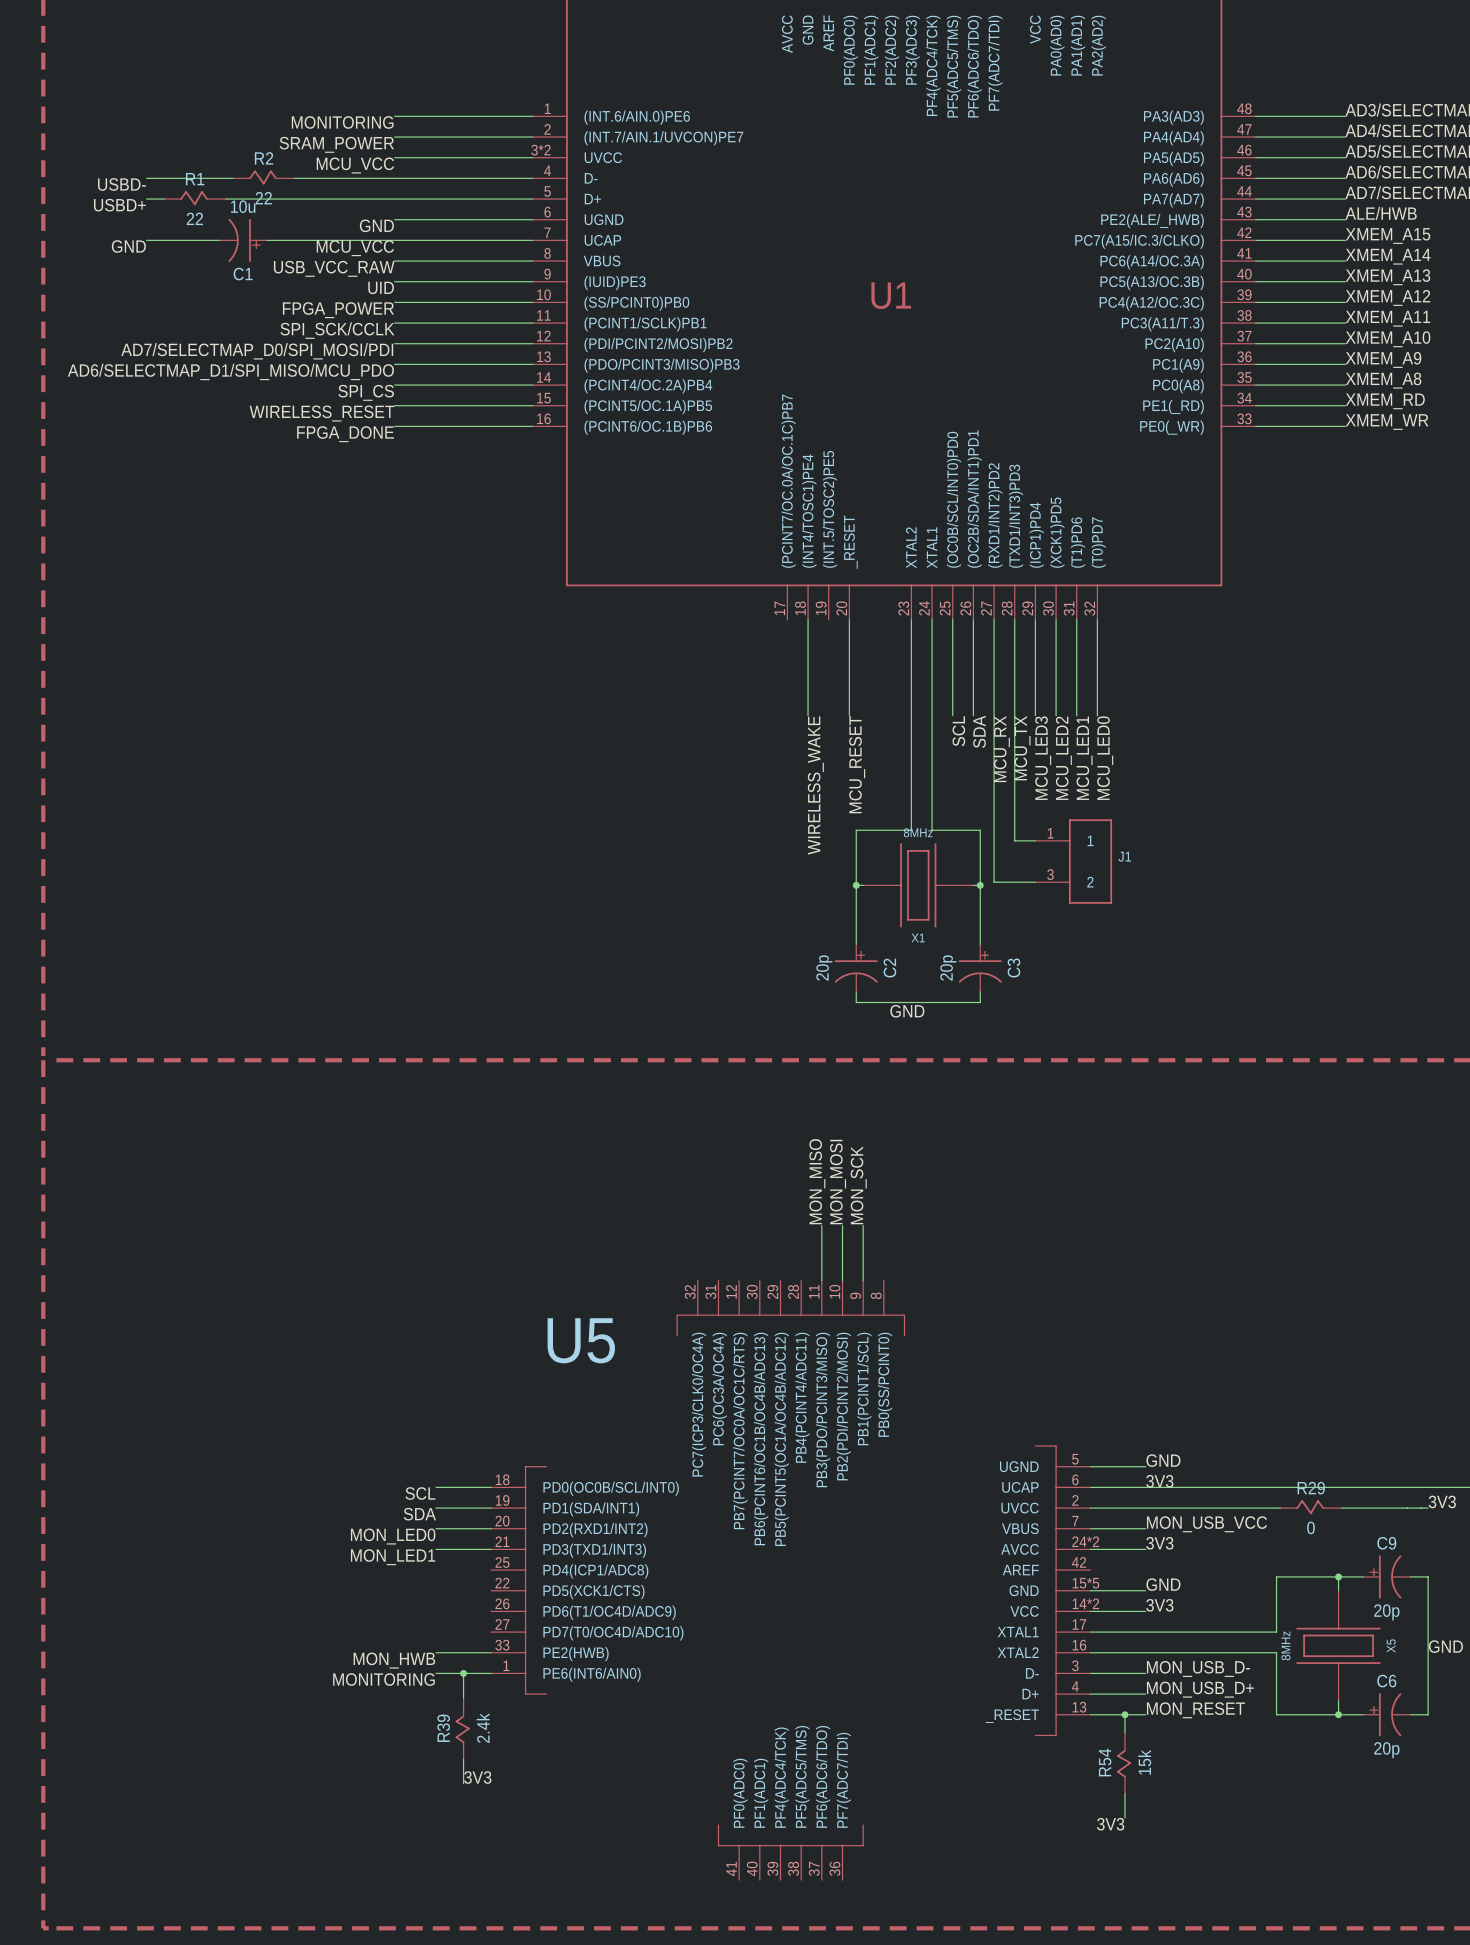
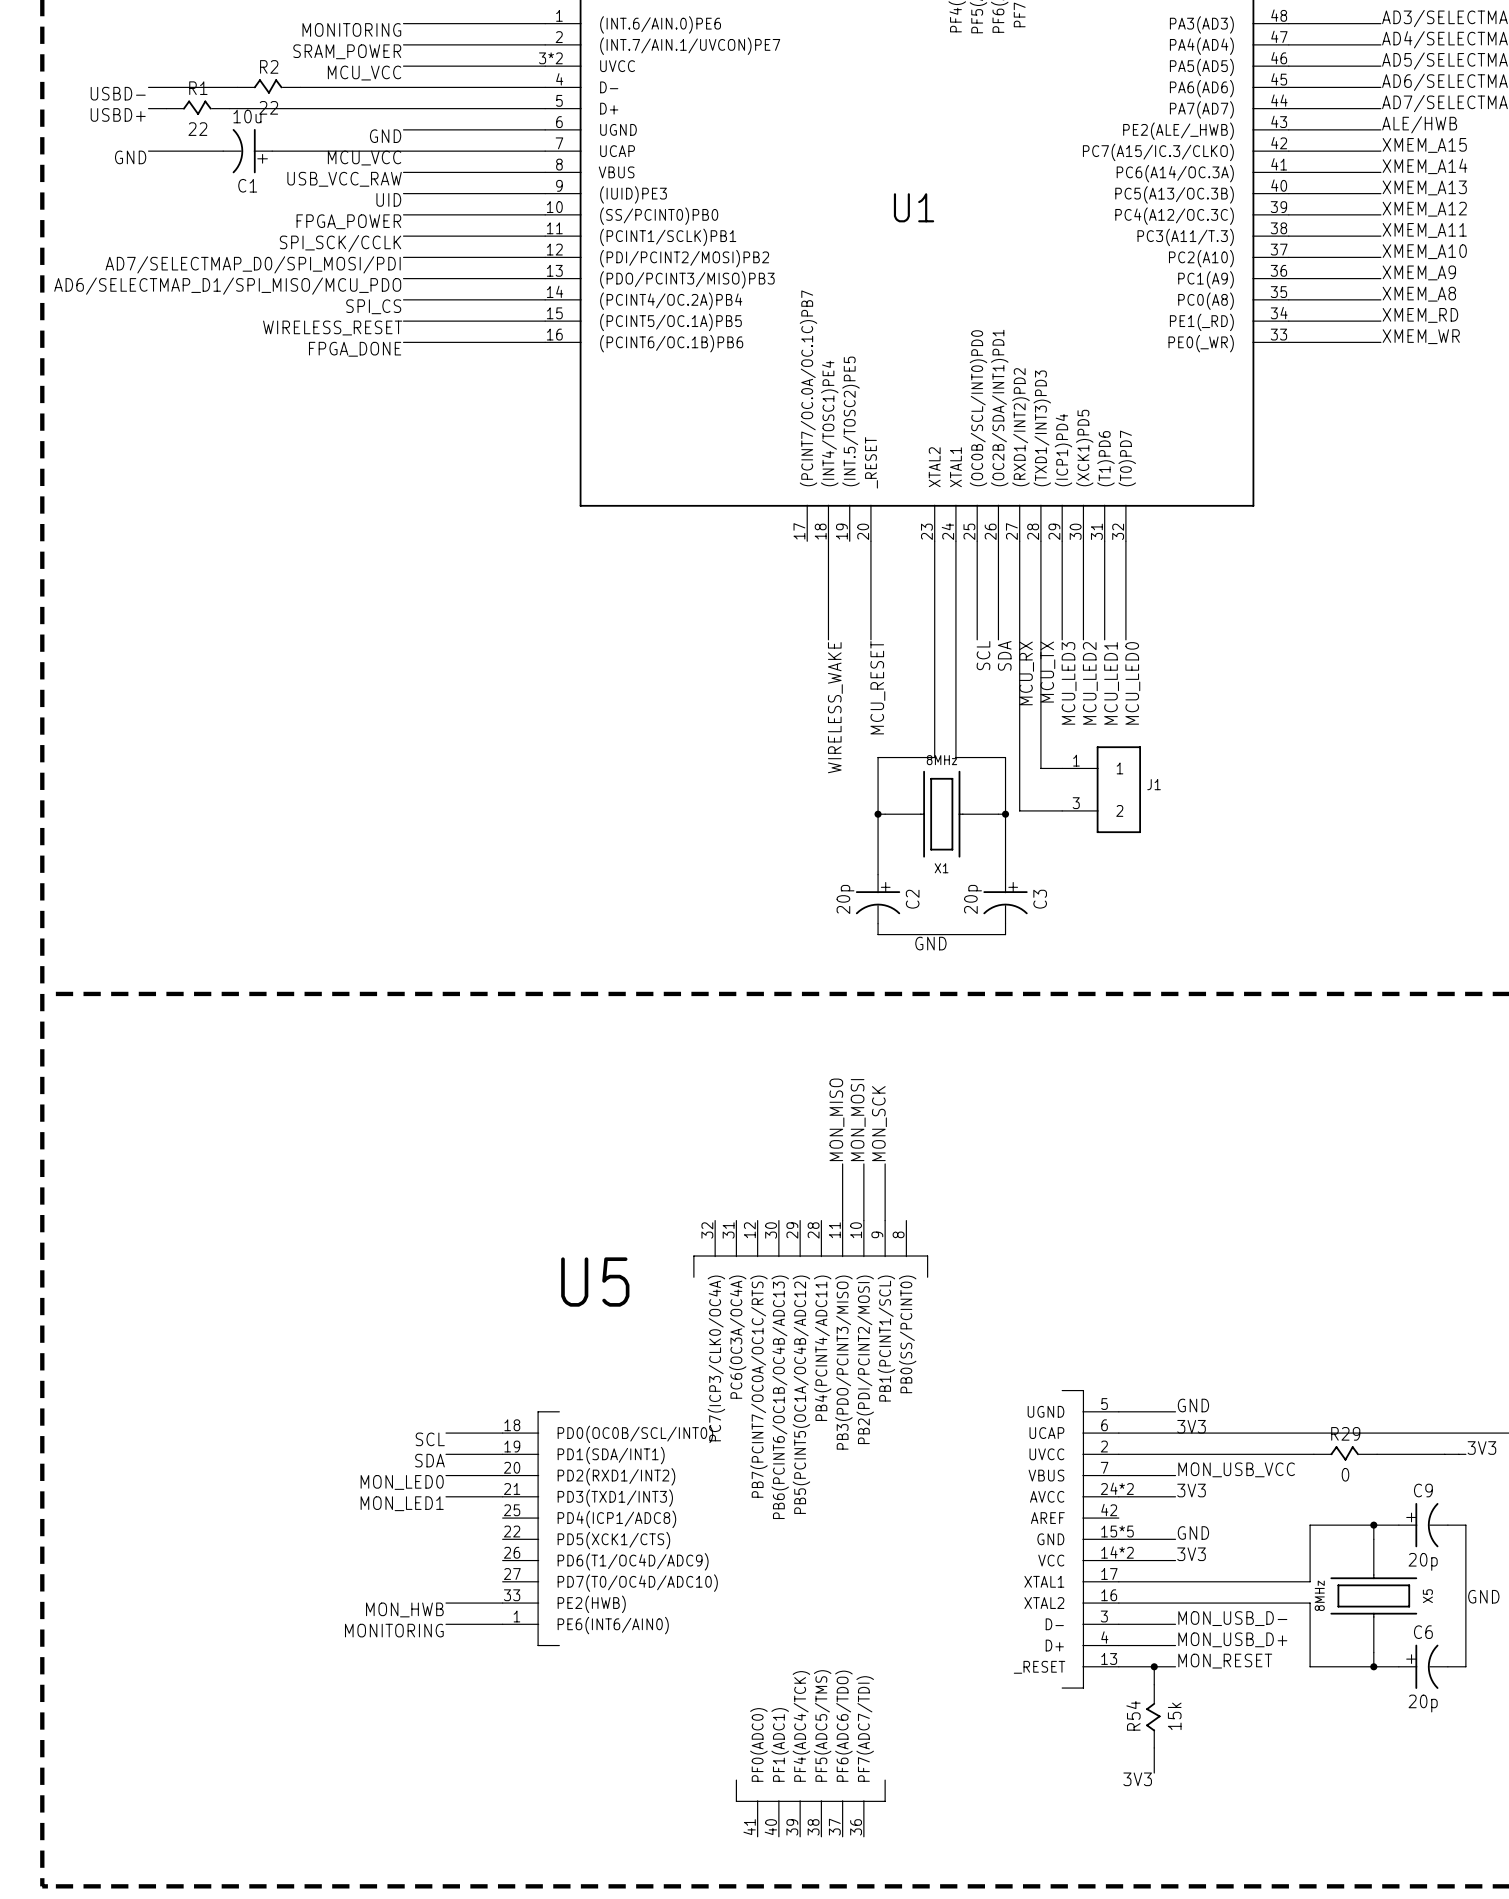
wire: (463, 1673) (463, 1697) -> none
junction: (463, 1673) -> none
R39: 2.4k (462, 1728) -> none
wire: (463, 1759) (463, 1783) -> none
label: 3V3 (477, 1777) -> none

